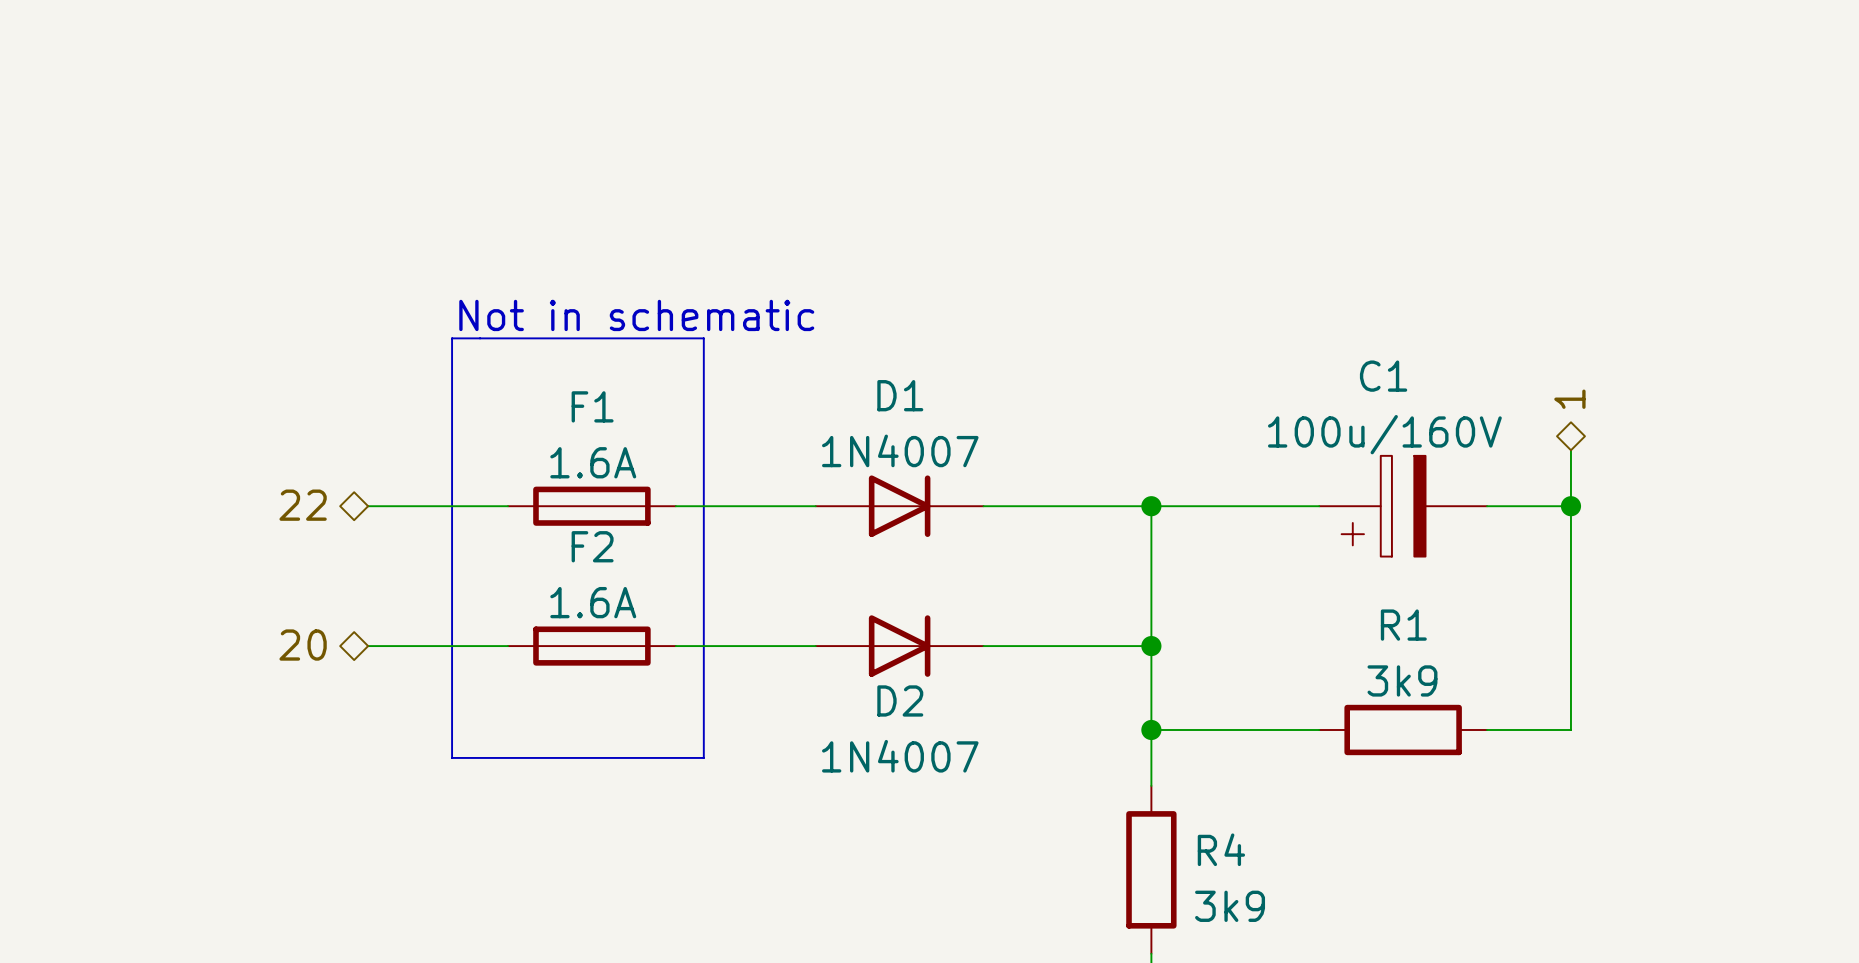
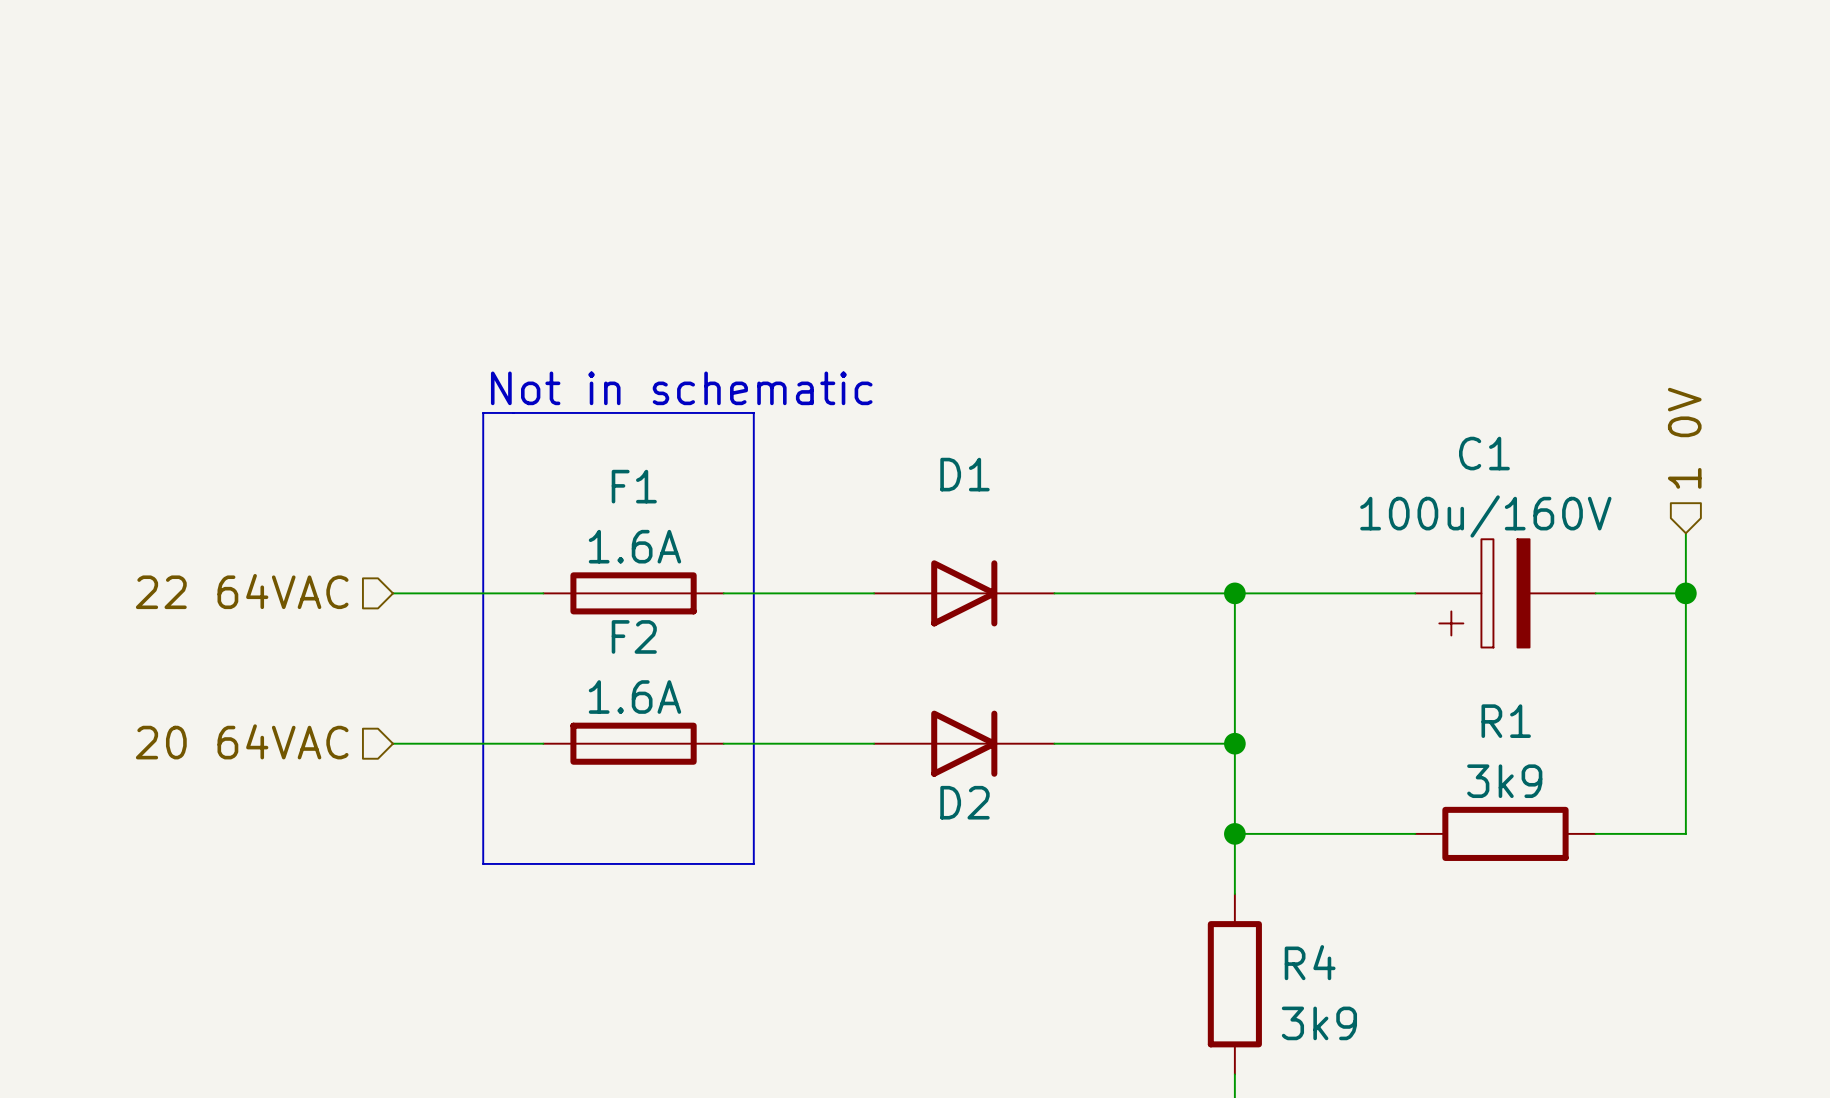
hierarchical label shape: bidirectional (1569, 399) -> input (1684, 438)
hierarchical label: 1 (1569, 399) -> 1 0V (1684, 438)
D1 value: 1N4007 (900, 450) -> none
hierarchical label shape: bidirectional (303, 505) -> input (242, 591)
hierarchical label: 22 (303, 505) -> 22 64VAC (242, 591)
hierarchical label shape: bidirectional (303, 645) -> input (242, 741)
hierarchical label: 20 (303, 645) -> 20 64VAC (242, 741)
D2 value: 1N4007 (900, 756) -> none

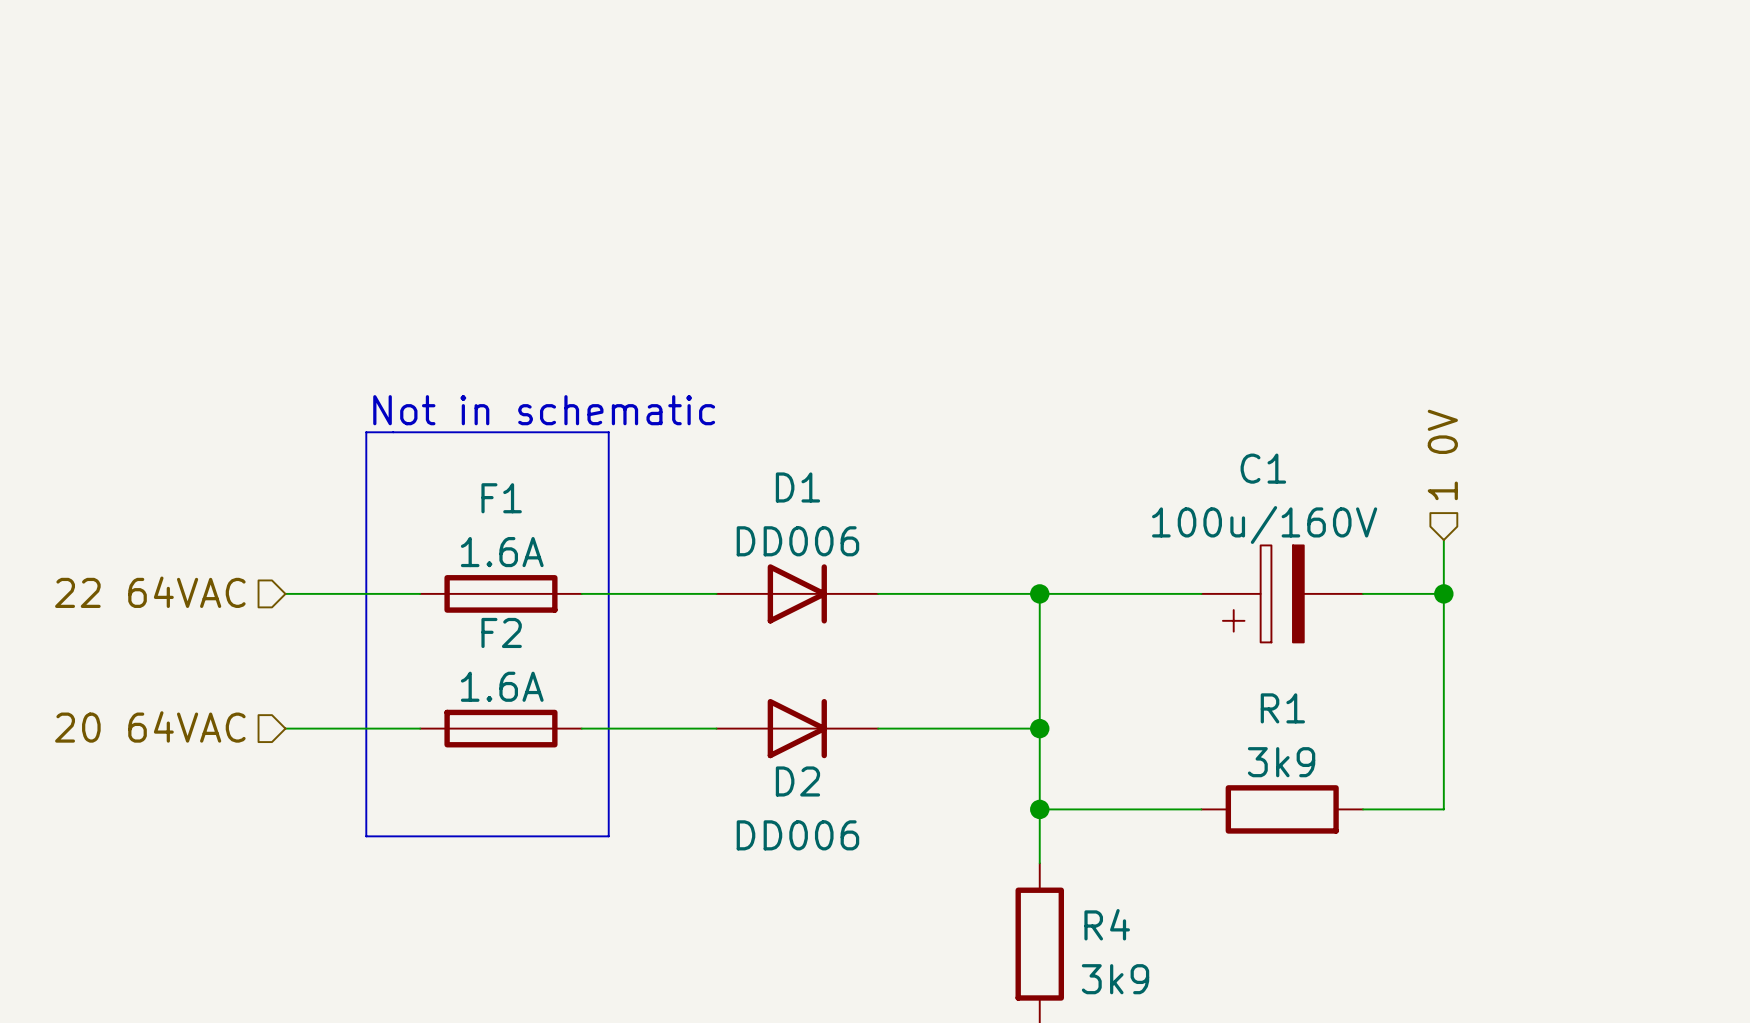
D1 value: none -> DD006 (797, 541)
D2 value: none -> DD006 (797, 835)

